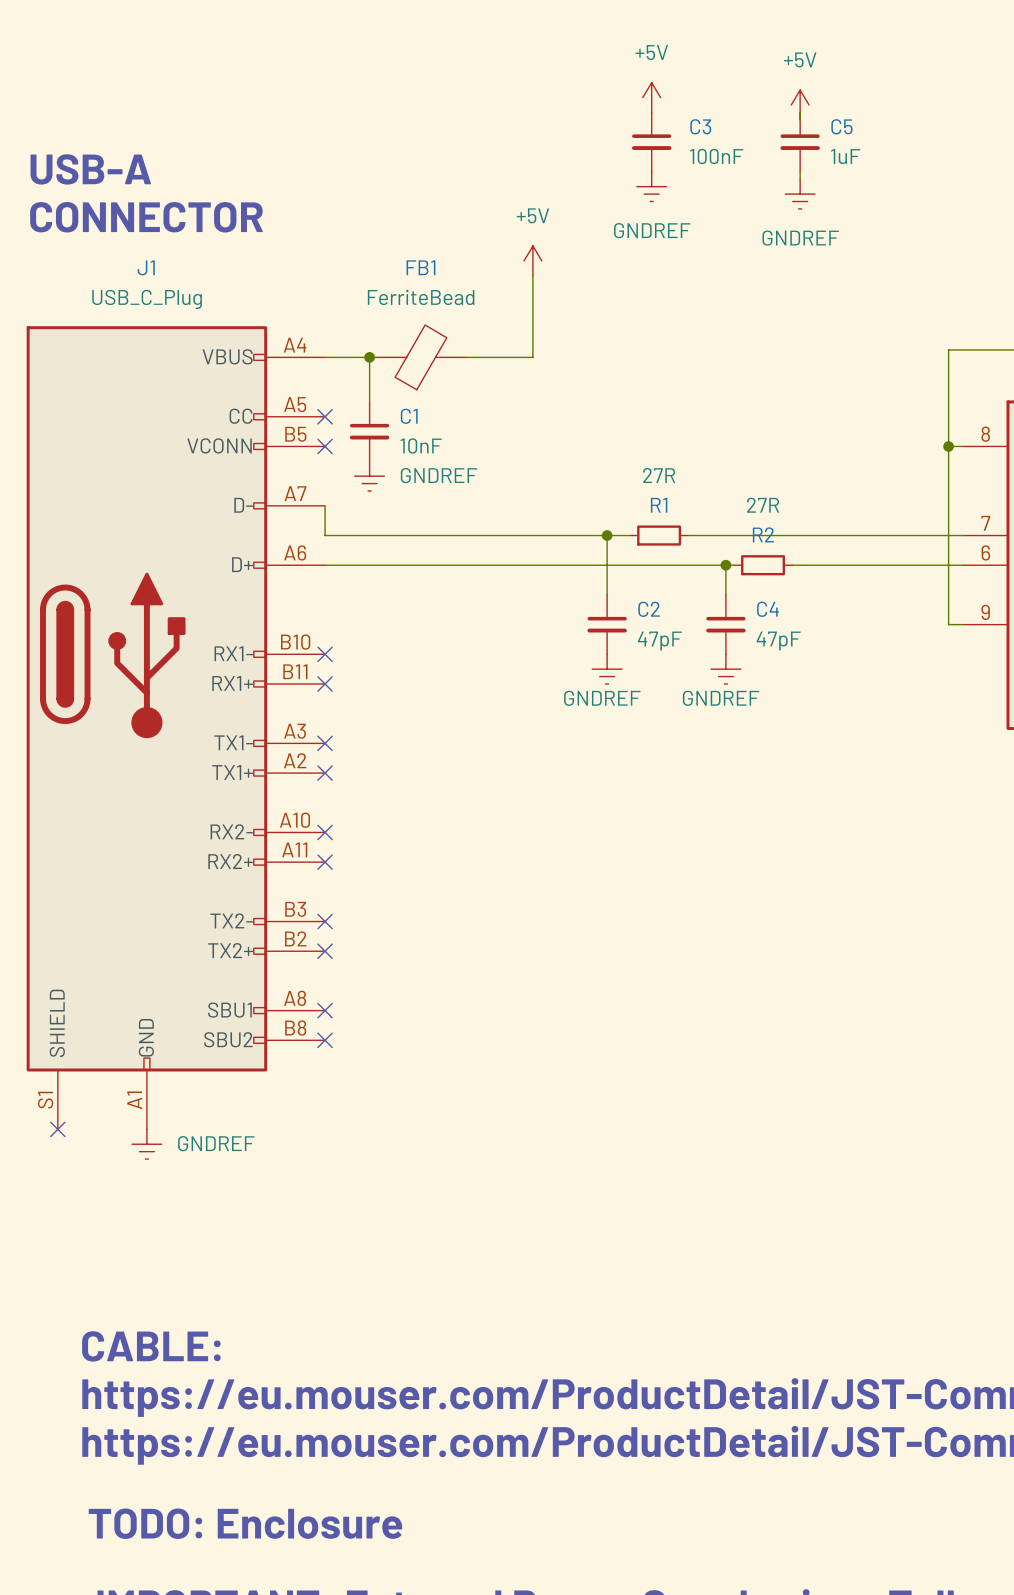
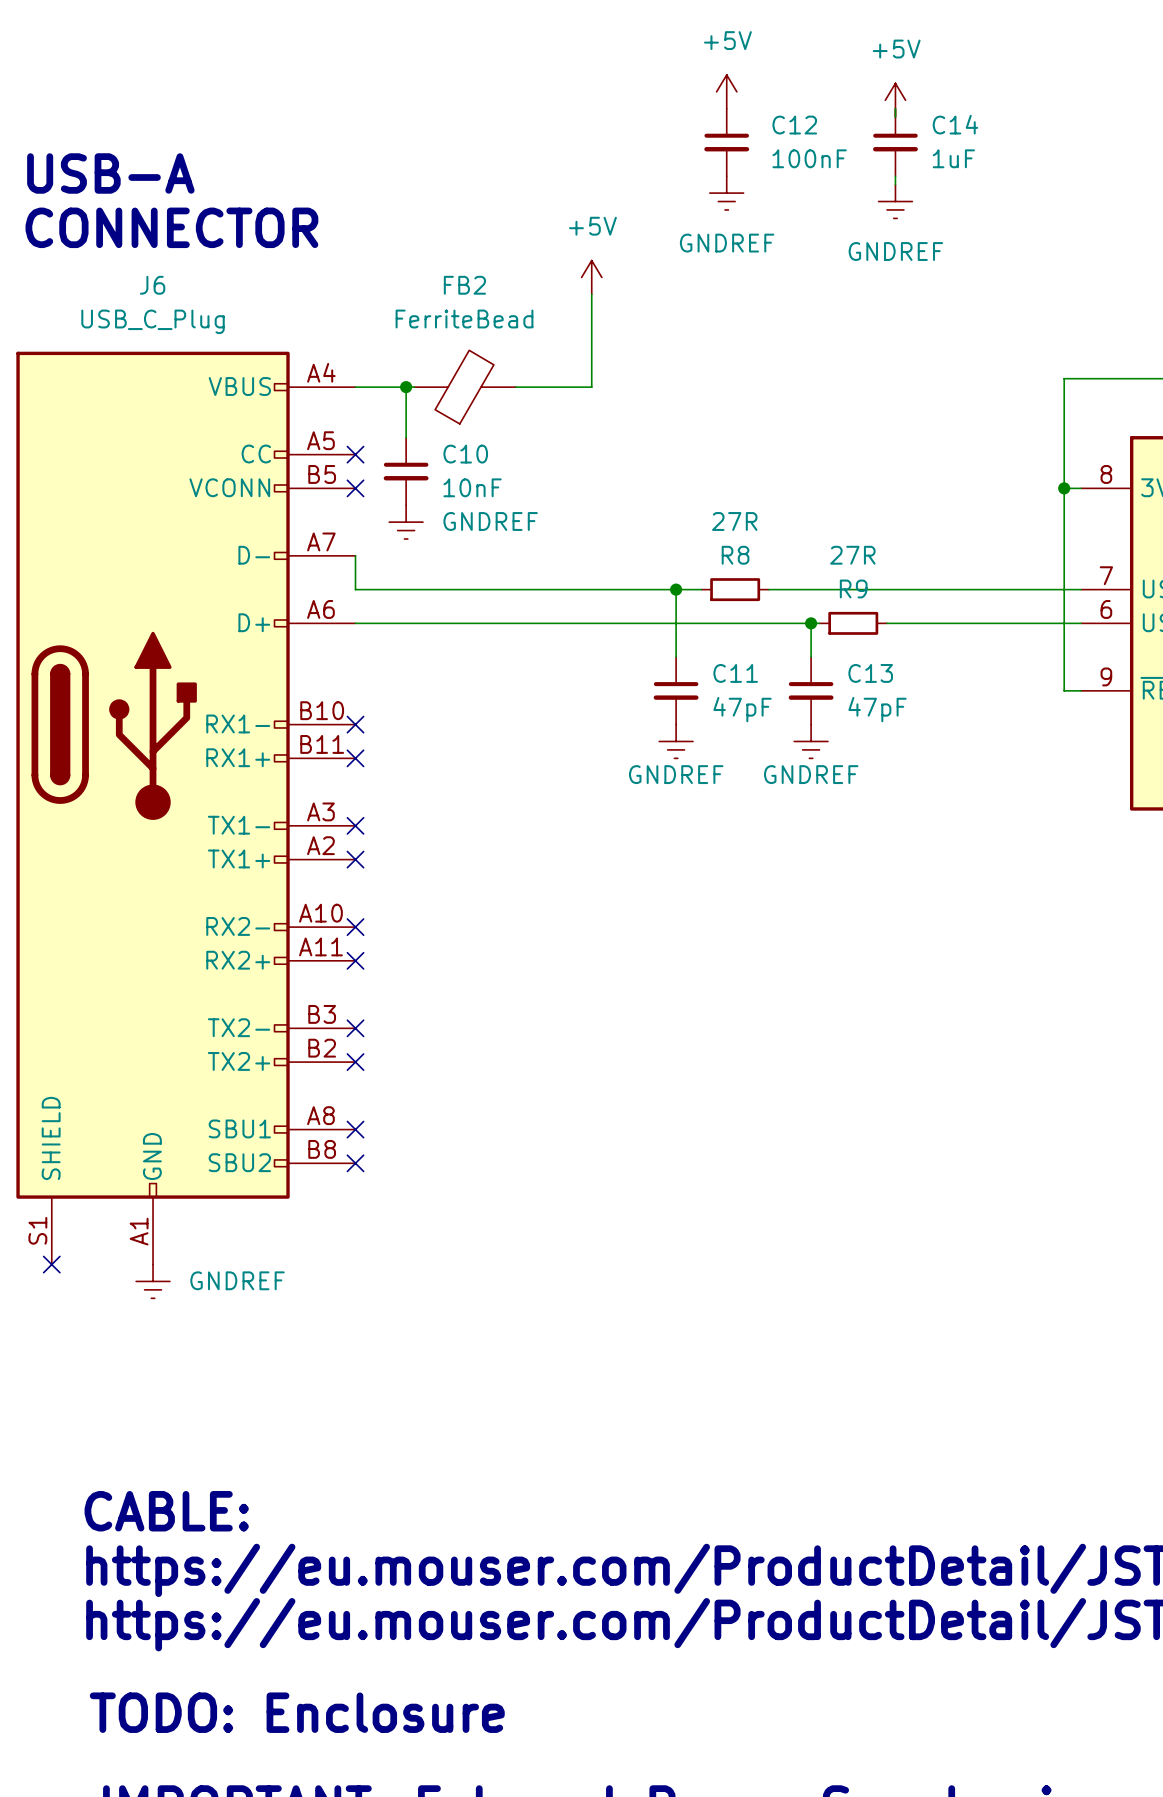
C3 name: C3 (700, 126) -> C12 (794, 125)
C5 name: C5 (841, 126) -> C14 (955, 124)
J1 name: J1 (146, 267) -> J6 (152, 285)
FB1 name: FB1 (420, 267) -> FB2 (464, 285)
C1 name: C1 (409, 416) -> C10 (465, 454)
R1 name: R1 (659, 505) -> R8 (735, 555)
R2 name: R2 (763, 534) -> R9 (853, 588)
C2 name: C2 (649, 609) -> C11 (735, 673)
C4 name: C4 (768, 609) -> C13 (870, 673)

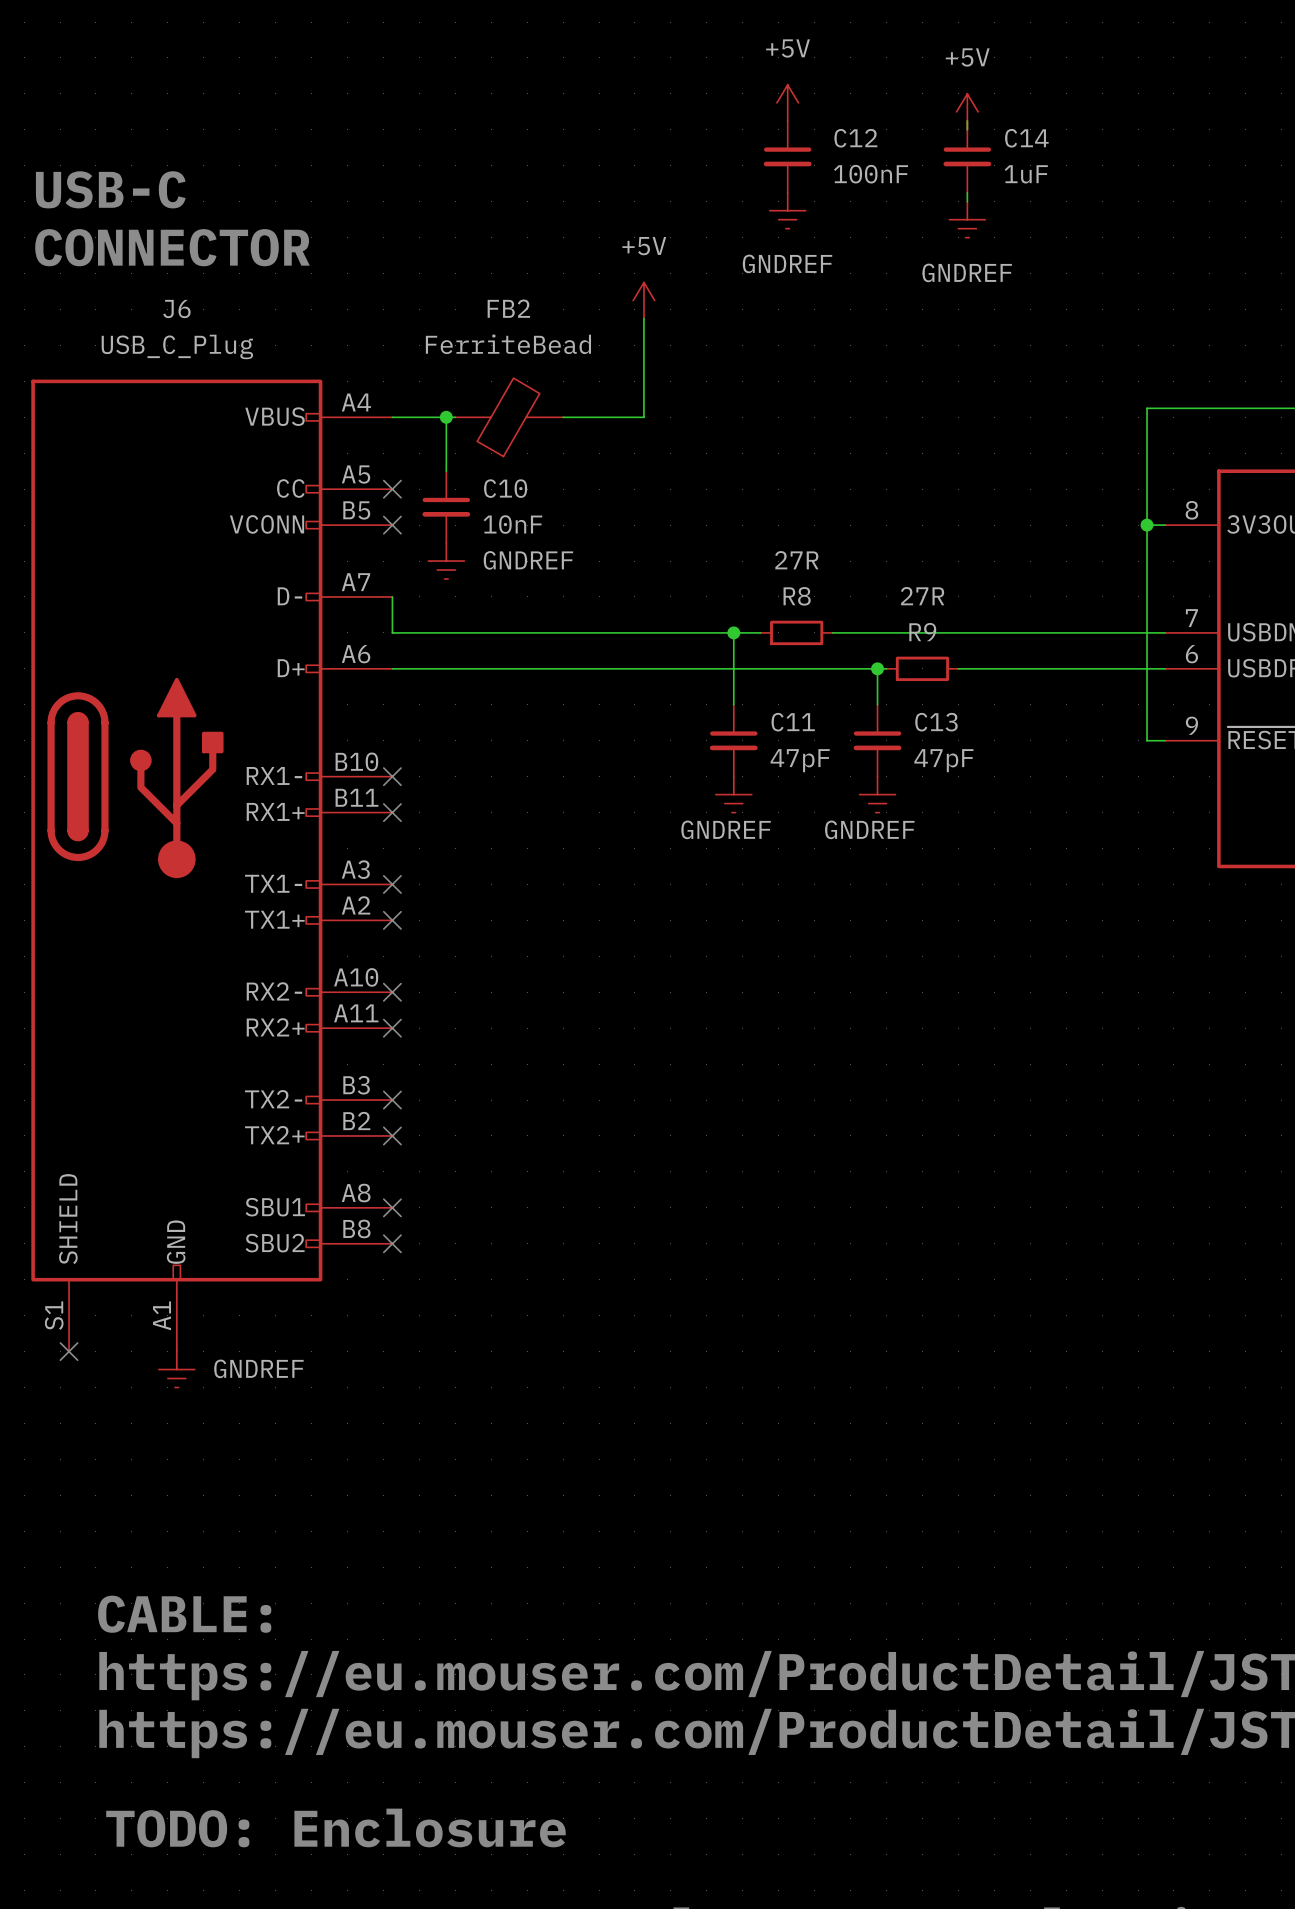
text: USB-A (110, 173) -> USB-C (110, 189)

